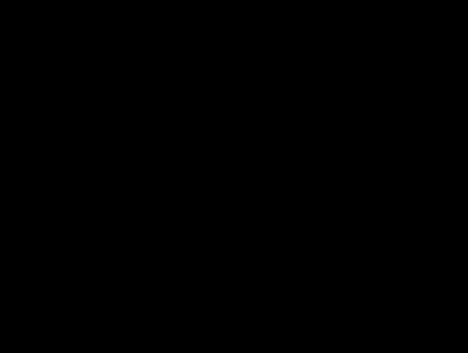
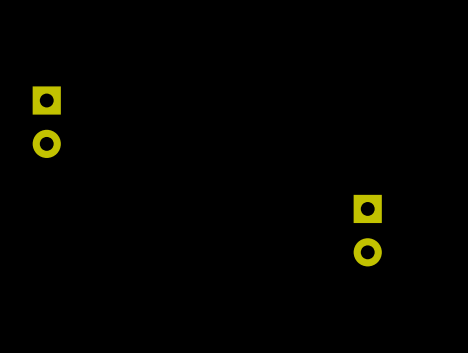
part: none -> (46, 122)
part: none -> (367, 230)

